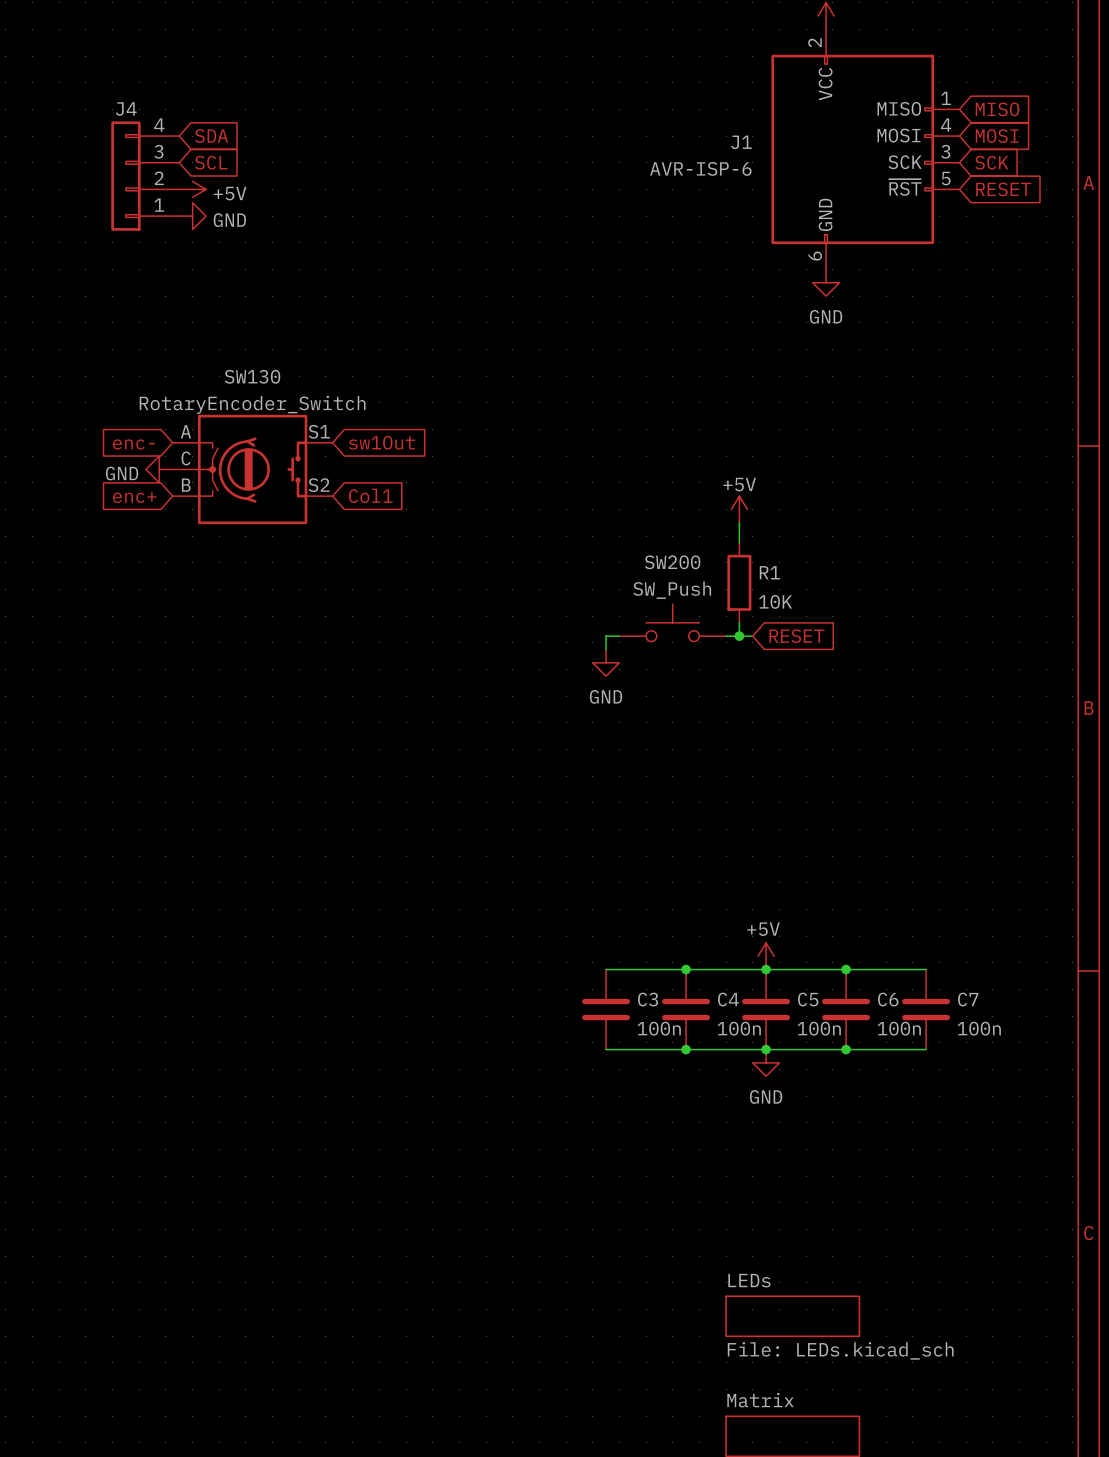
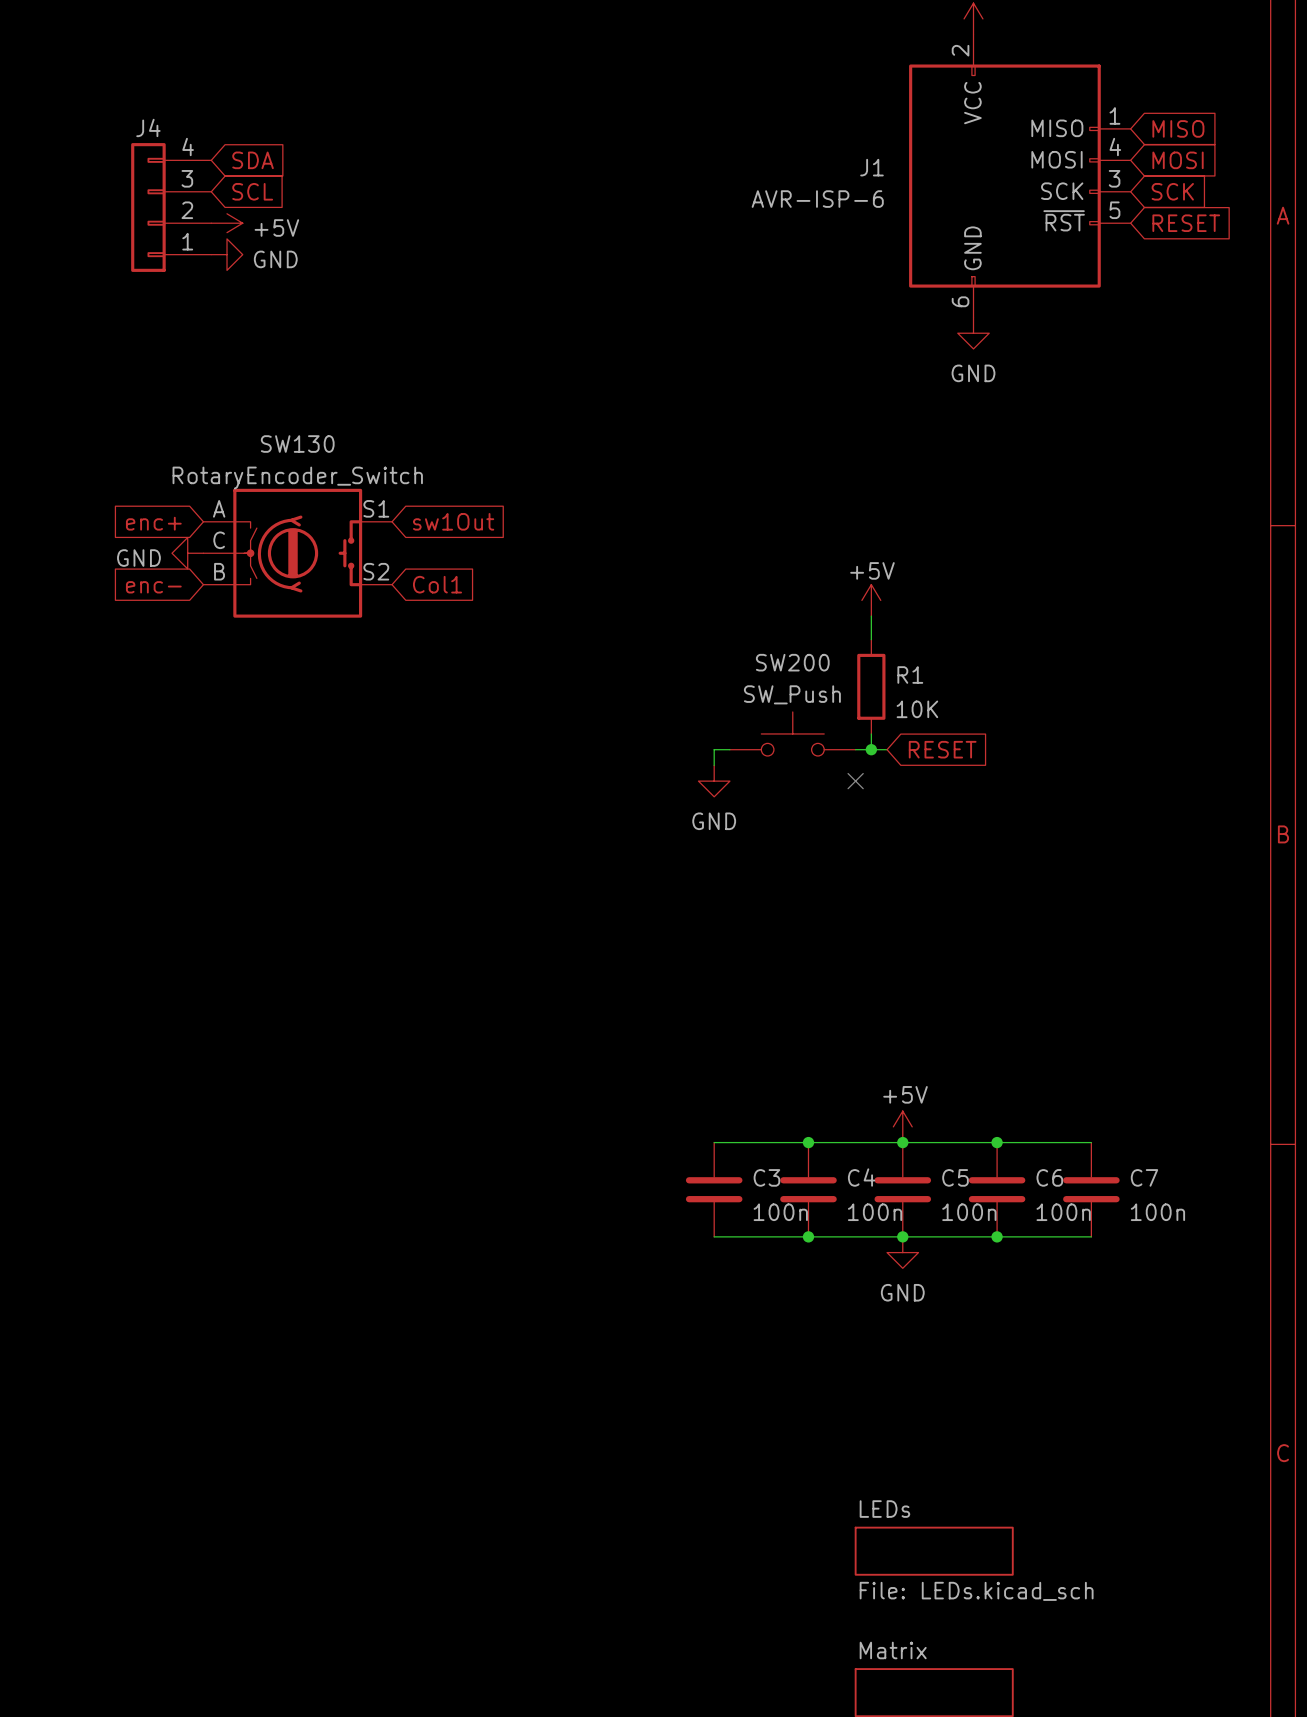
global label: enc- (133, 444) -> enc+ (153, 523)
global label: enc+ (134, 497) -> enc- (153, 587)
no-connect mark: none -> (855, 781)

